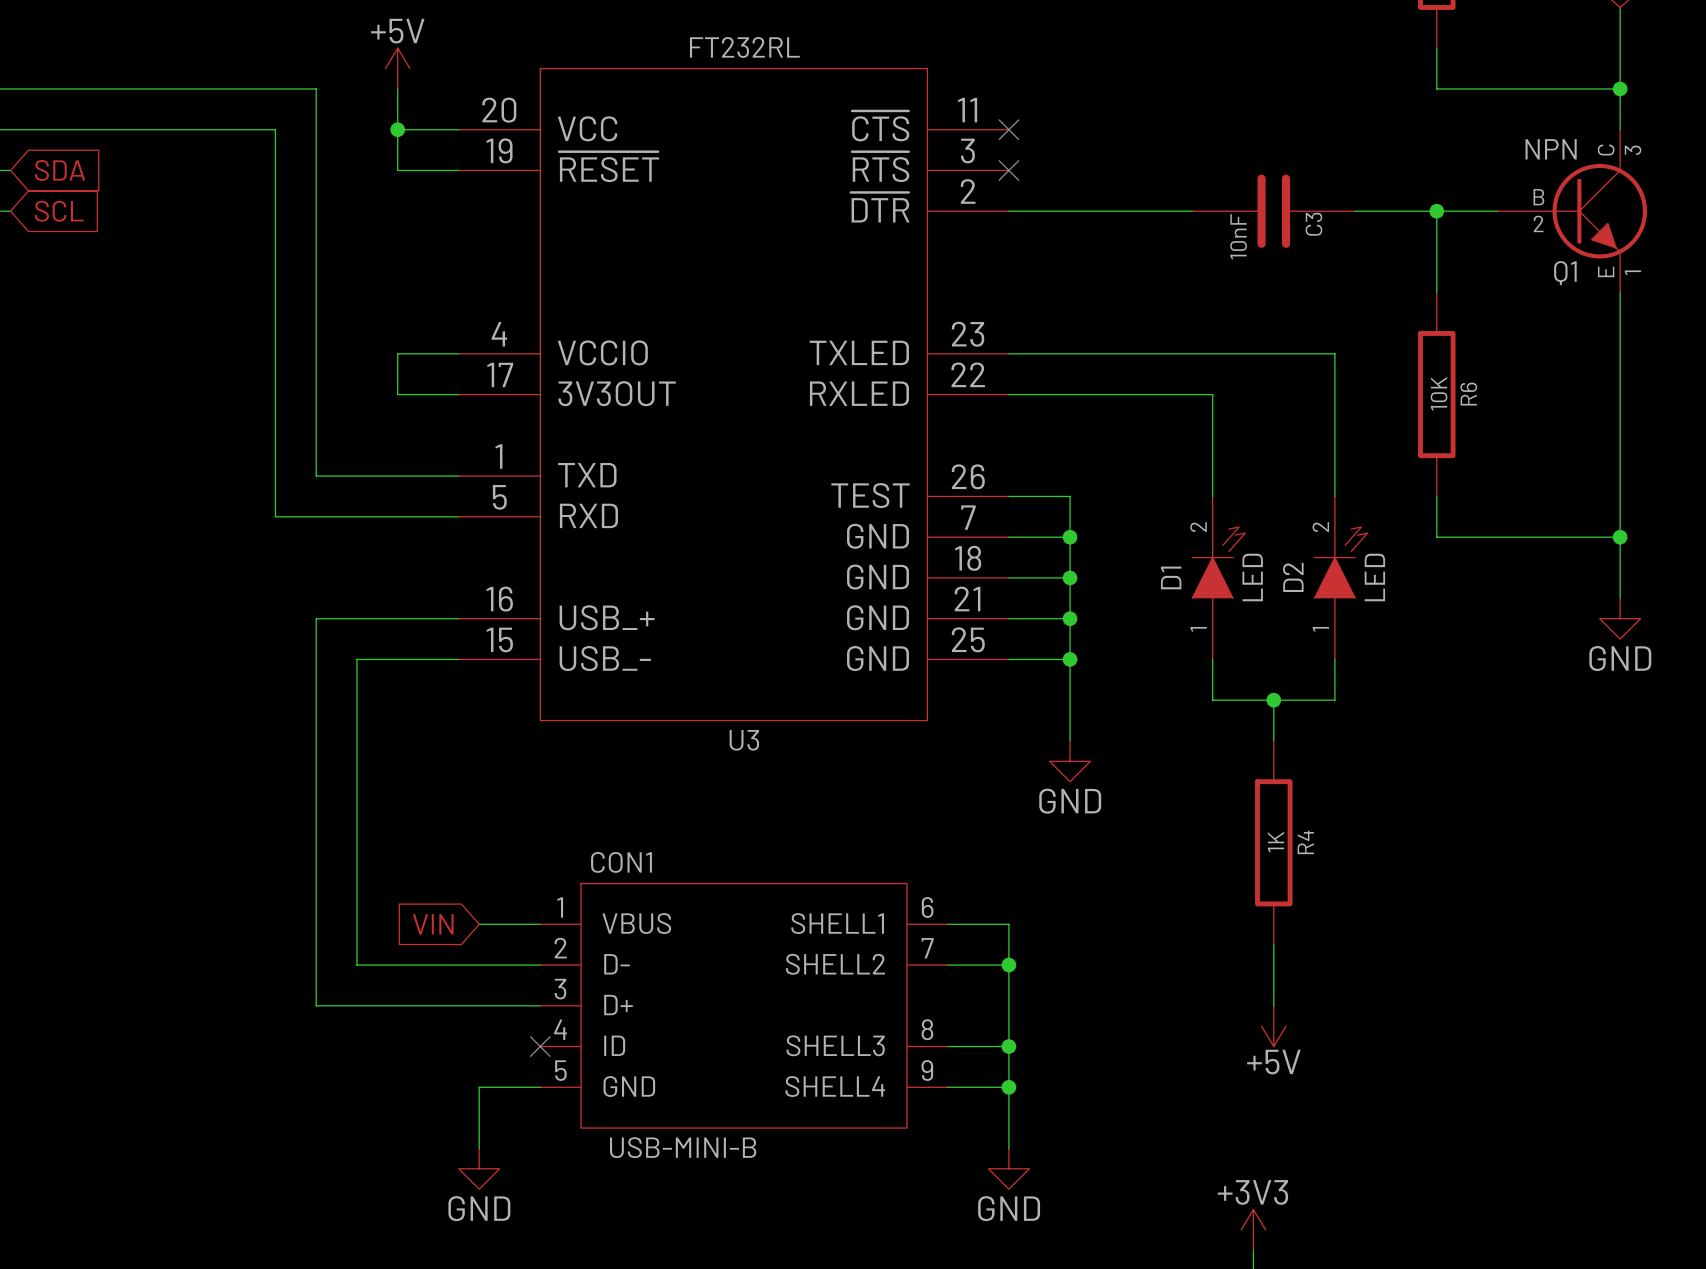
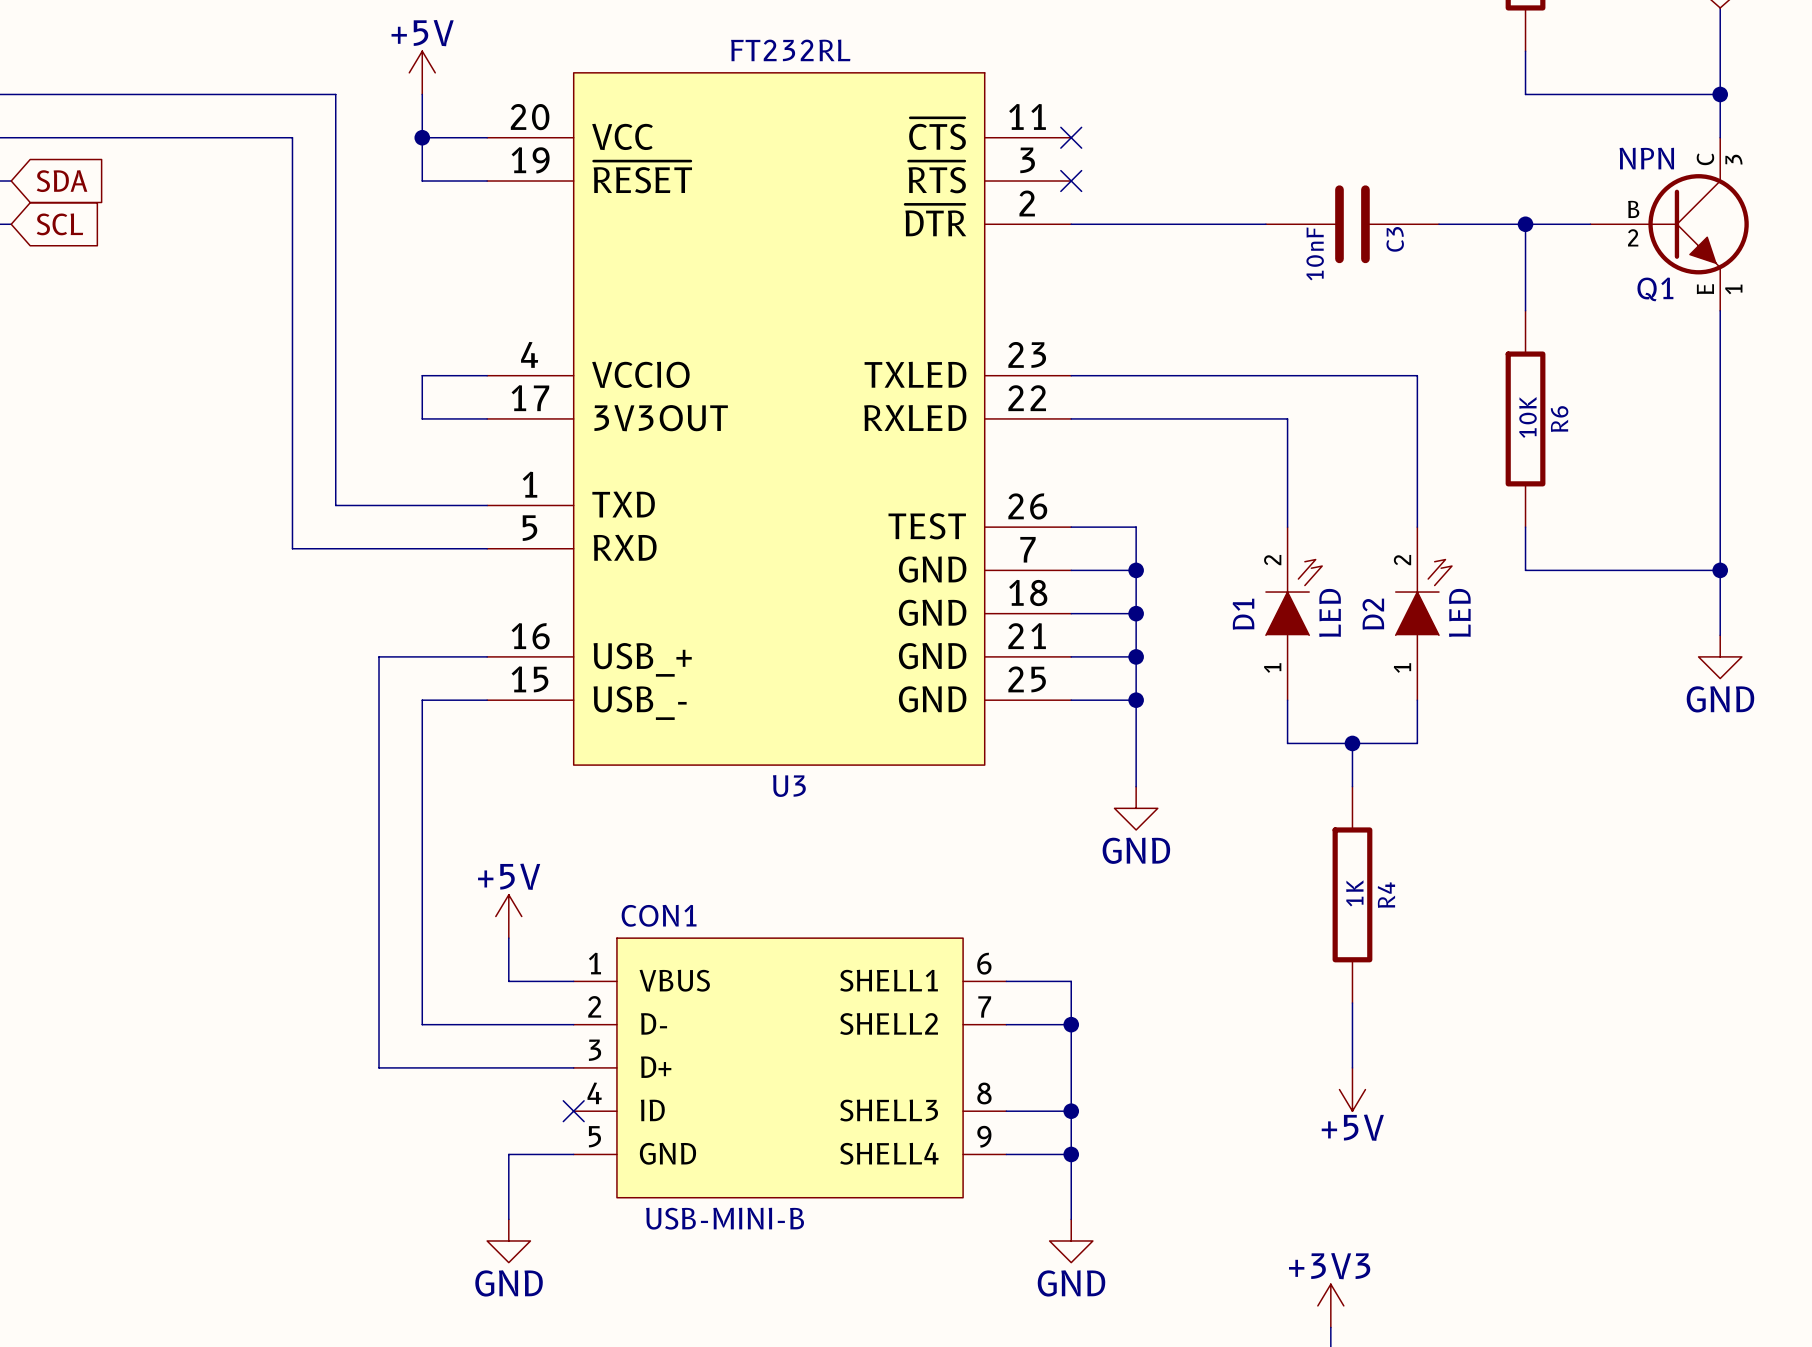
wire: (356, 618) (316, 618) (316, 1005) (356, 1005) -> none
wire: (356, 659) (397, 659) -> (379, 700) (379, 656)
wire: none -> (422, 700) (422, 1024)
power symbol: none -> +5V (508, 916)
wire: none -> (508, 938) (508, 981)
global label: VIN (433, 924) -> none
wire: (356, 965) (397, 965) -> (379, 1024) (379, 1067)

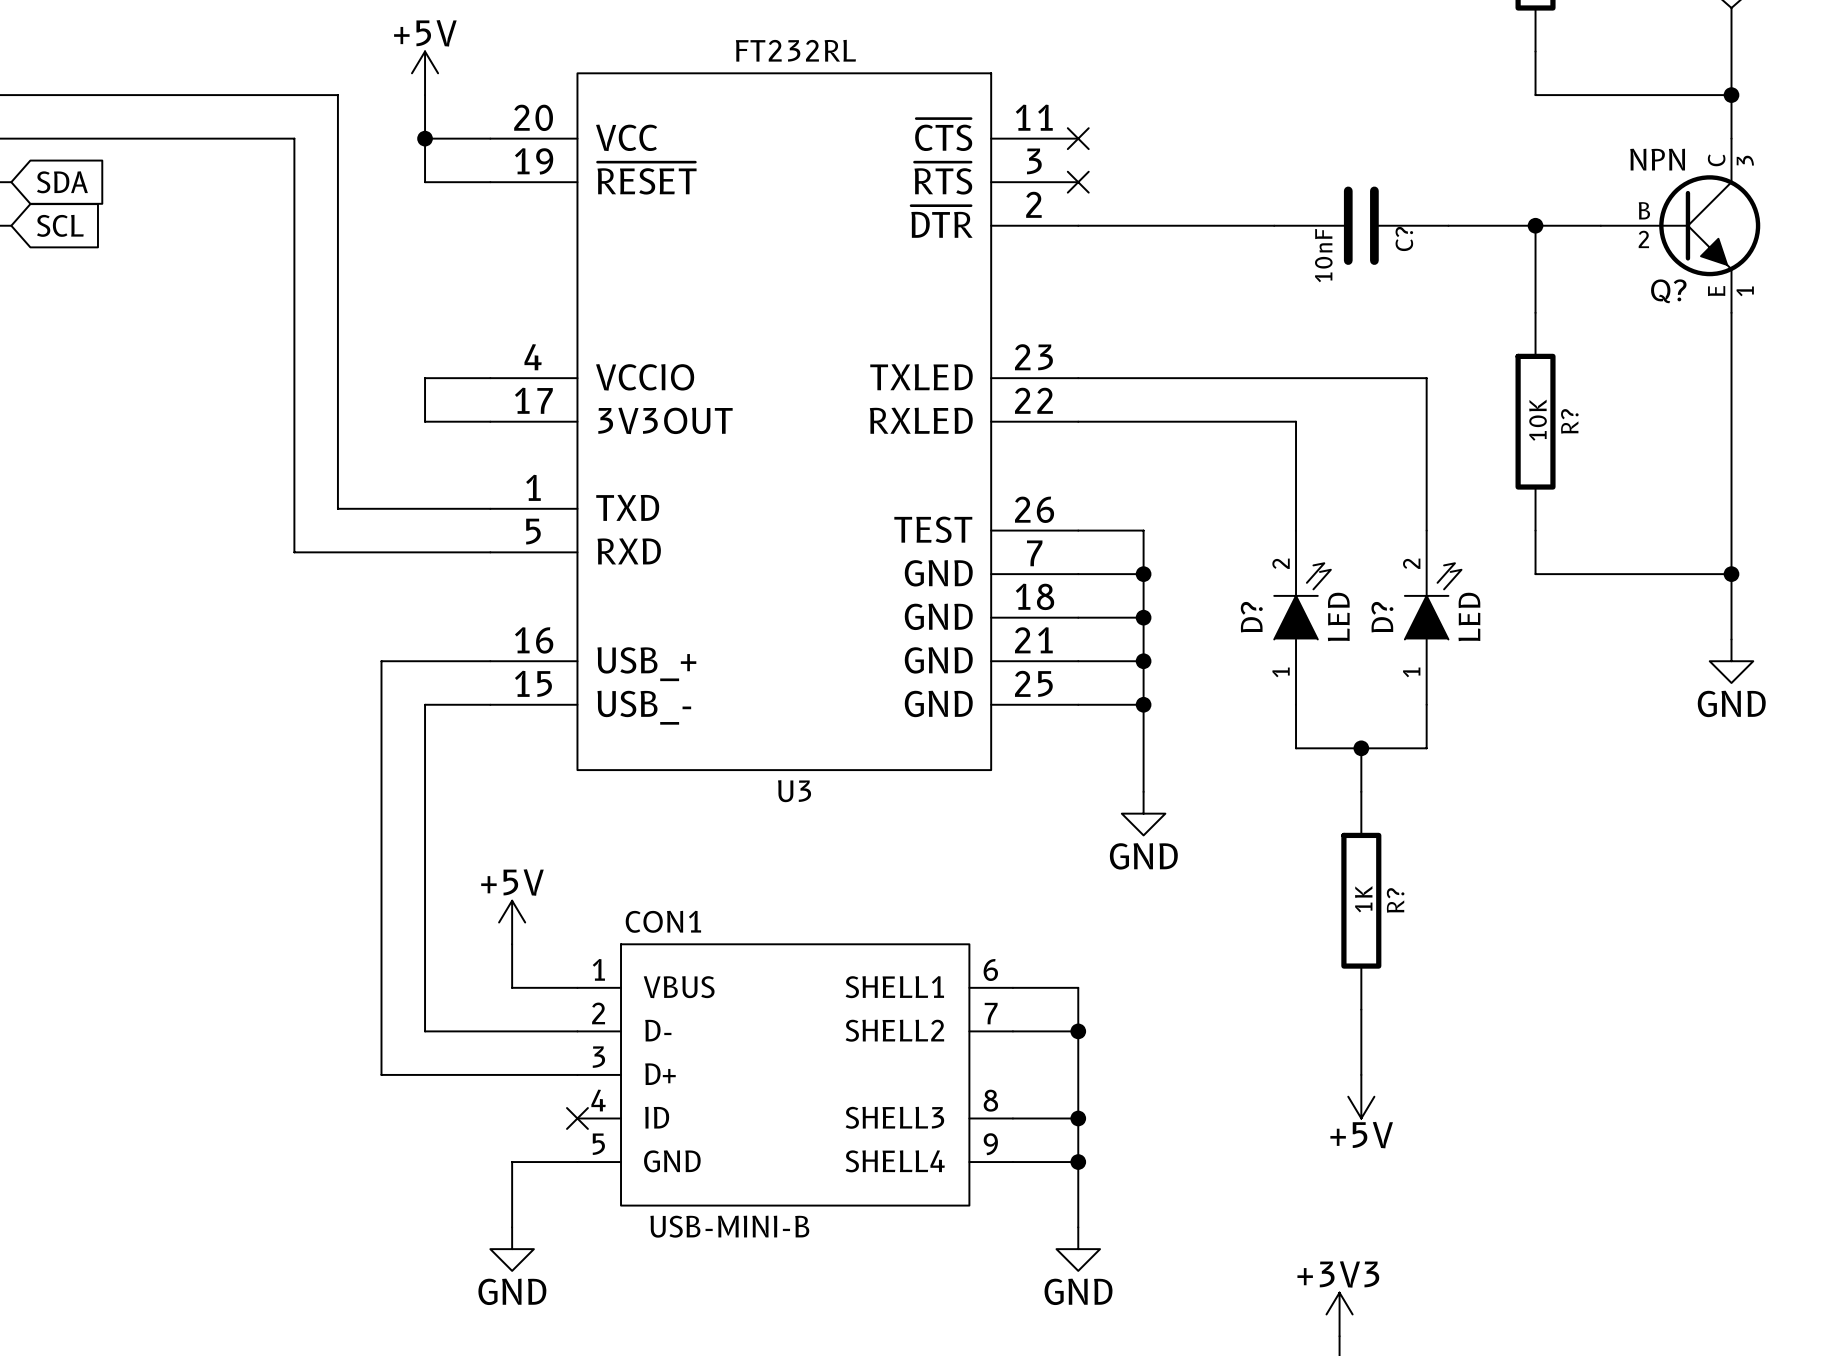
C3 name: C3 (1395, 239) -> C? (1404, 238)
Q1 name: Q1 (1655, 289) -> Q? (1668, 291)
R6 name: R6 (1559, 419) -> R? (1569, 421)
D1 name: D1 (1243, 614) -> D? (1251, 617)
D2 name: D2 (1373, 614) -> D? (1382, 617)
R4 name: R4 (1386, 895) -> R? (1395, 900)

